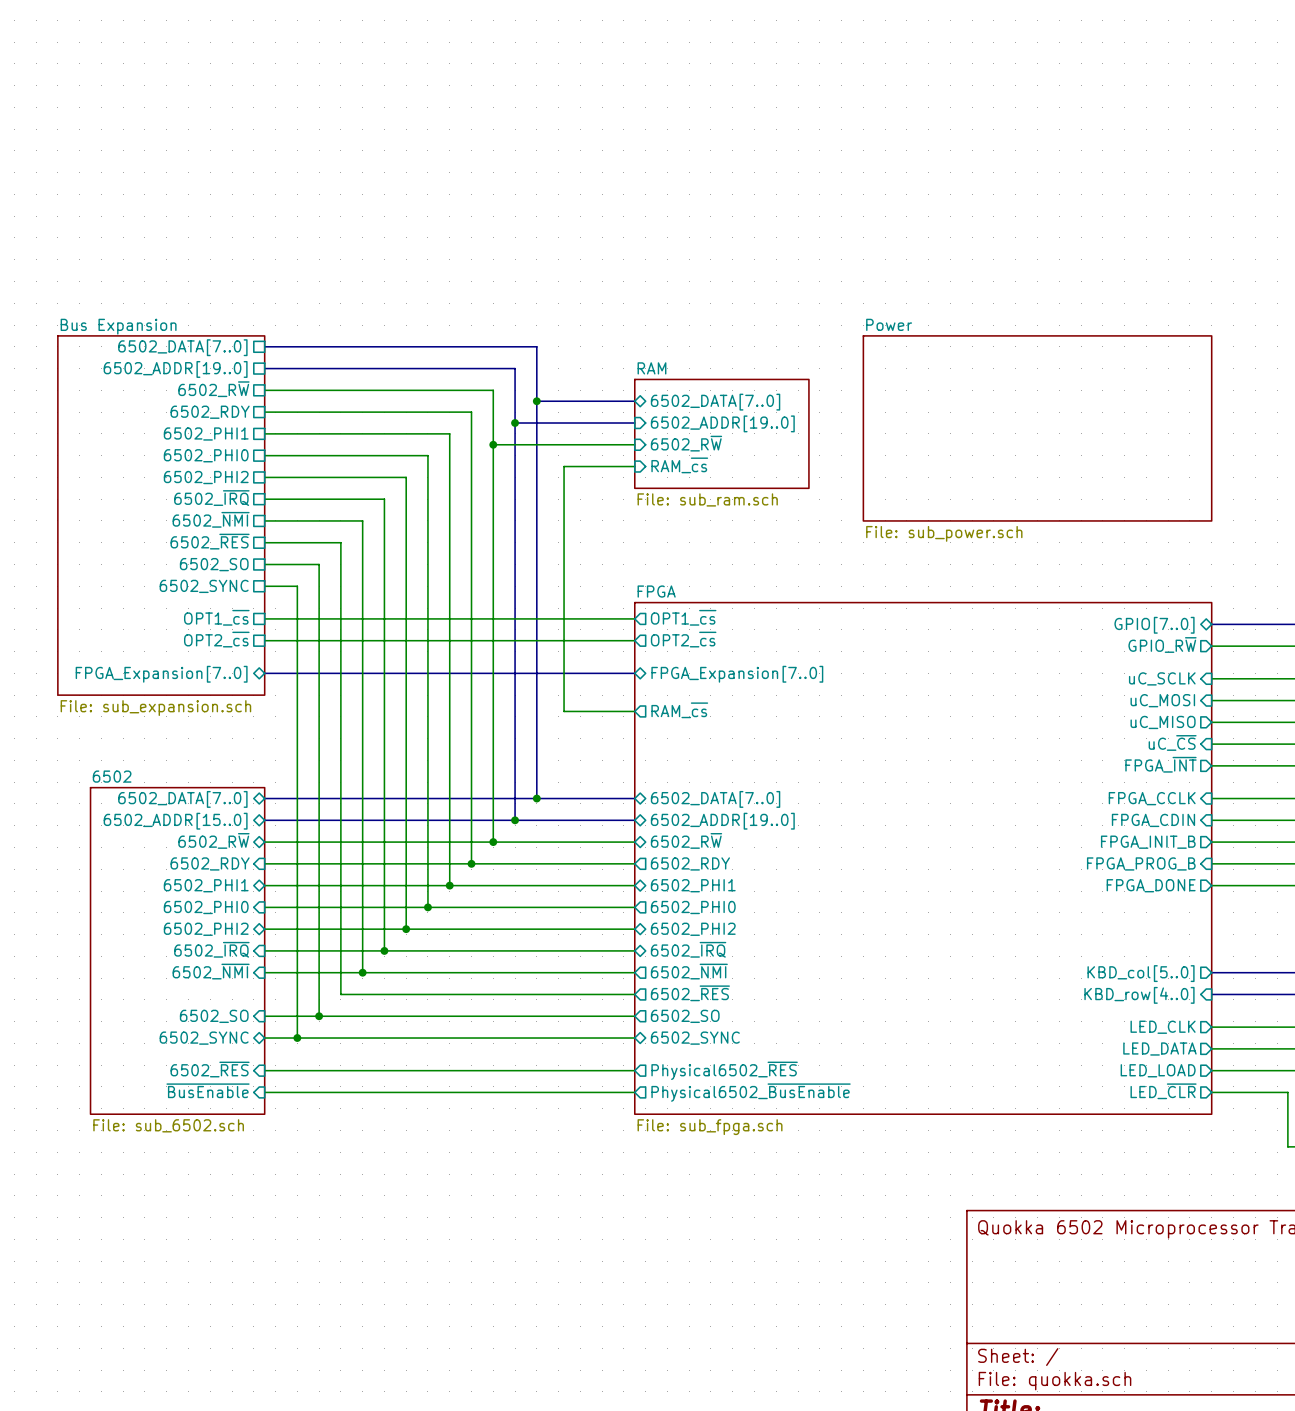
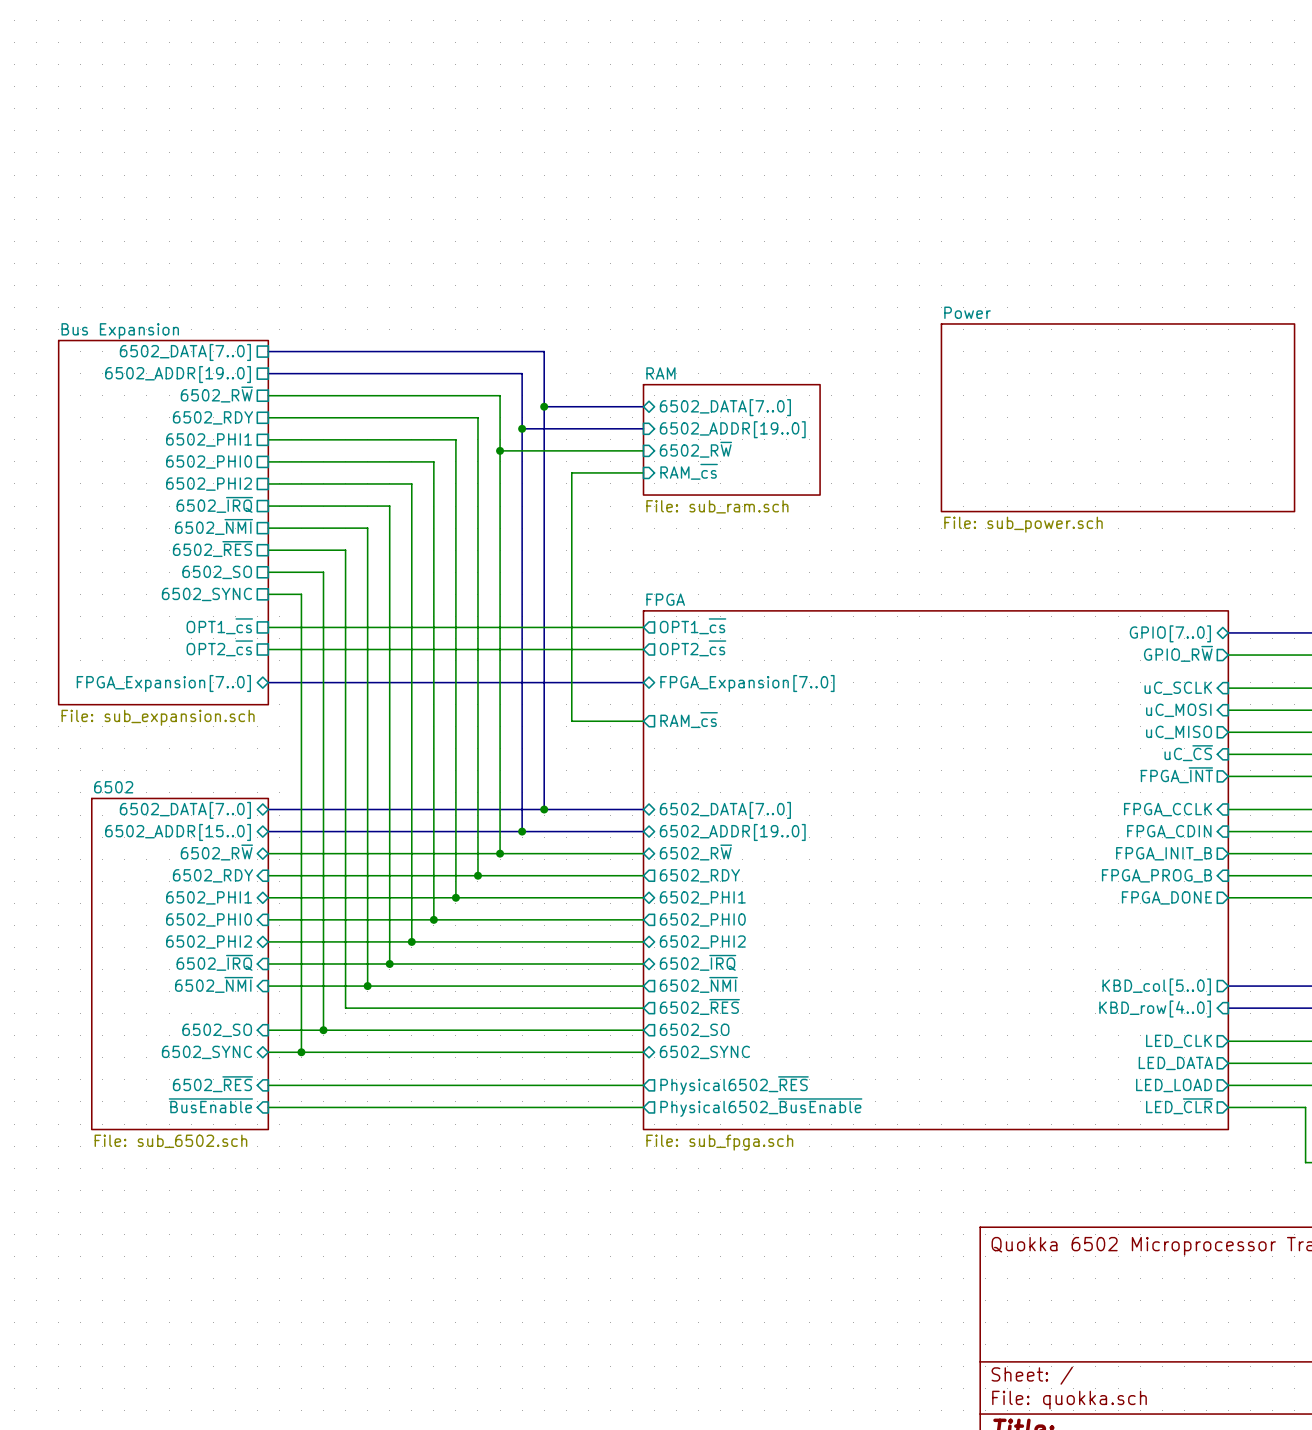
sheet Power position: (1037, 428) -> (1118, 417)

